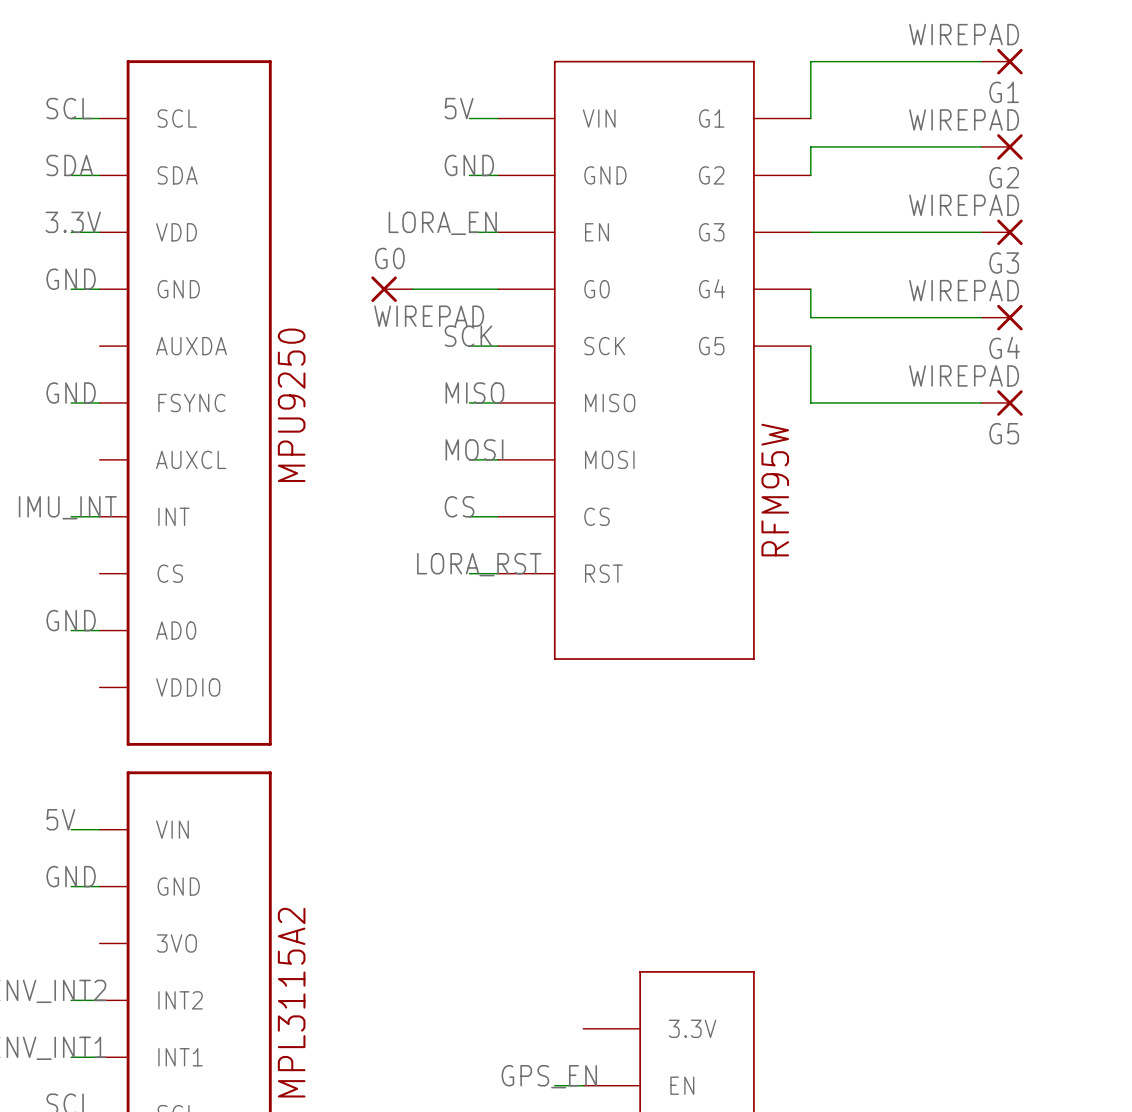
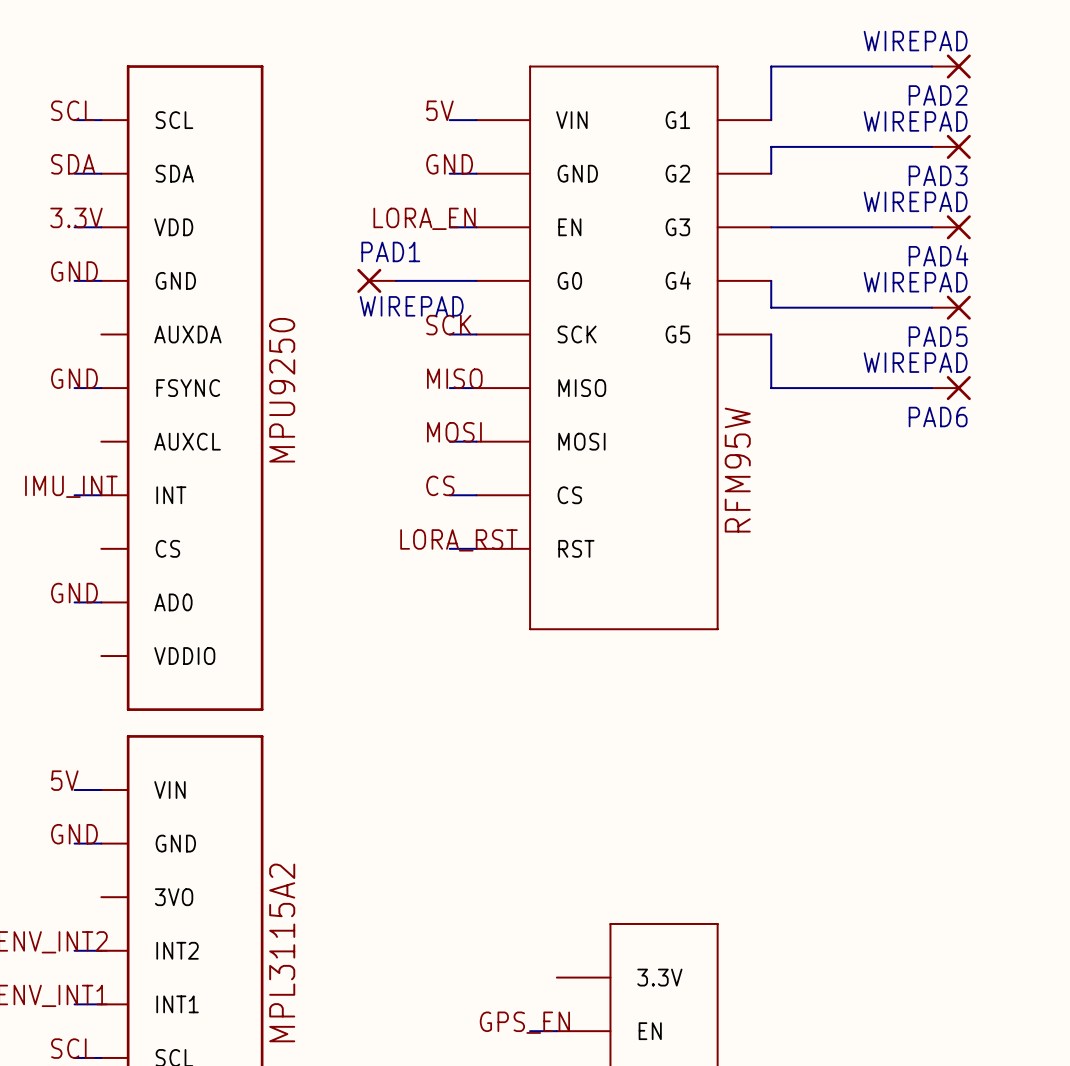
G1 name: G1 (1004, 92) -> PAD2 (938, 95)
G2 name: G2 (1004, 177) -> PAD3 (938, 175)
G0 name: G0 (389, 258) -> PAD1 (390, 251)
G3 name: G3 (1004, 263) -> PAD4 (938, 255)
G4 name: G4 (1004, 347) -> PAD5 (938, 336)
G5 name: G5 (1004, 433) -> PAD6 (938, 417)

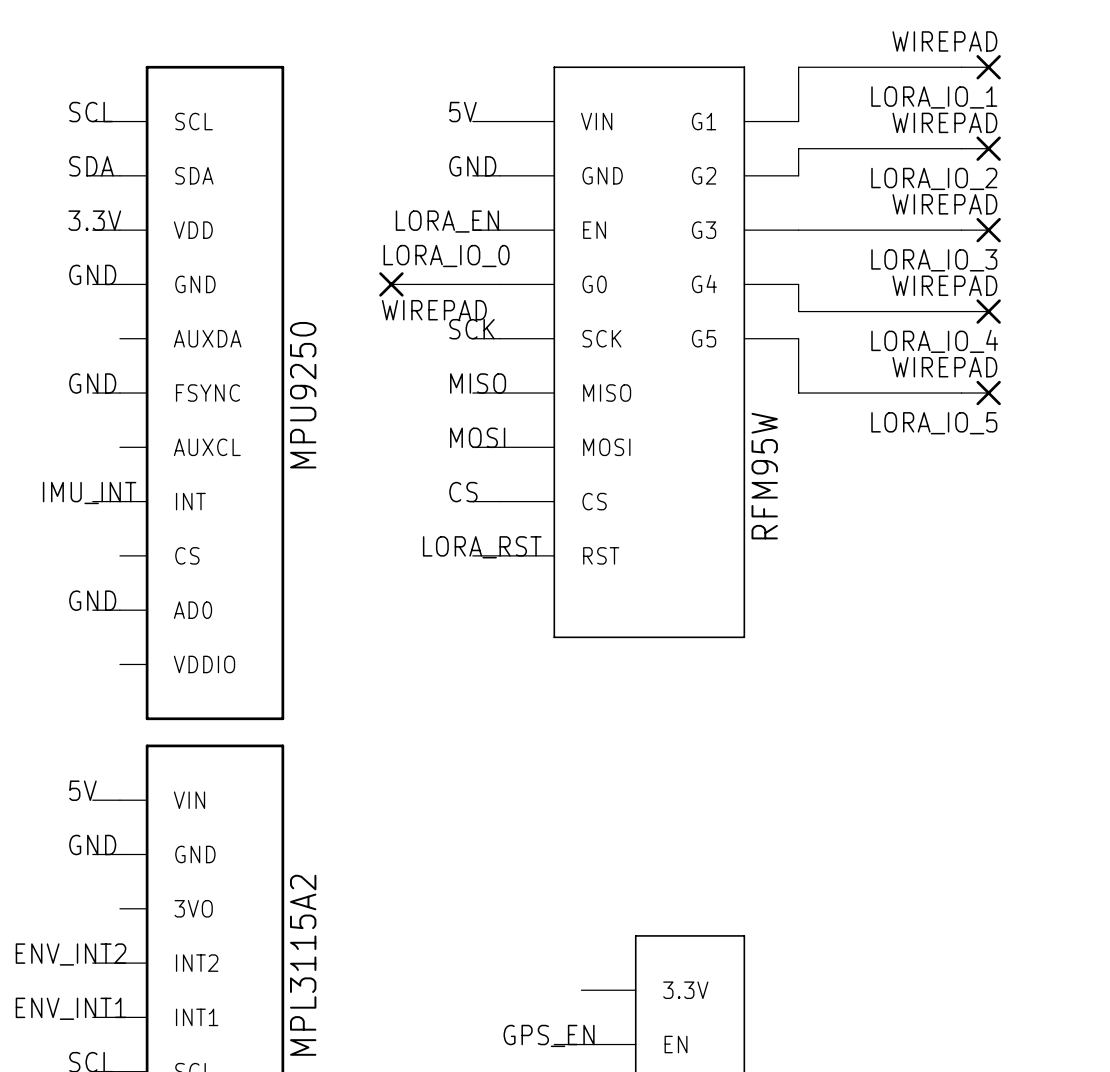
PAD2 name: PAD2 (938, 95) -> LORA_IO_1 (934, 97)
PAD3 name: PAD3 (938, 175) -> LORA_IO_2 (934, 178)
PAD1 name: PAD1 (390, 251) -> LORA_IO_0 (446, 256)
PAD4 name: PAD4 (938, 255) -> LORA_IO_3 (934, 260)
PAD5 name: PAD5 (938, 336) -> LORA_IO_4 (934, 341)
PAD6 name: PAD6 (938, 417) -> LORA_IO_5 (934, 423)

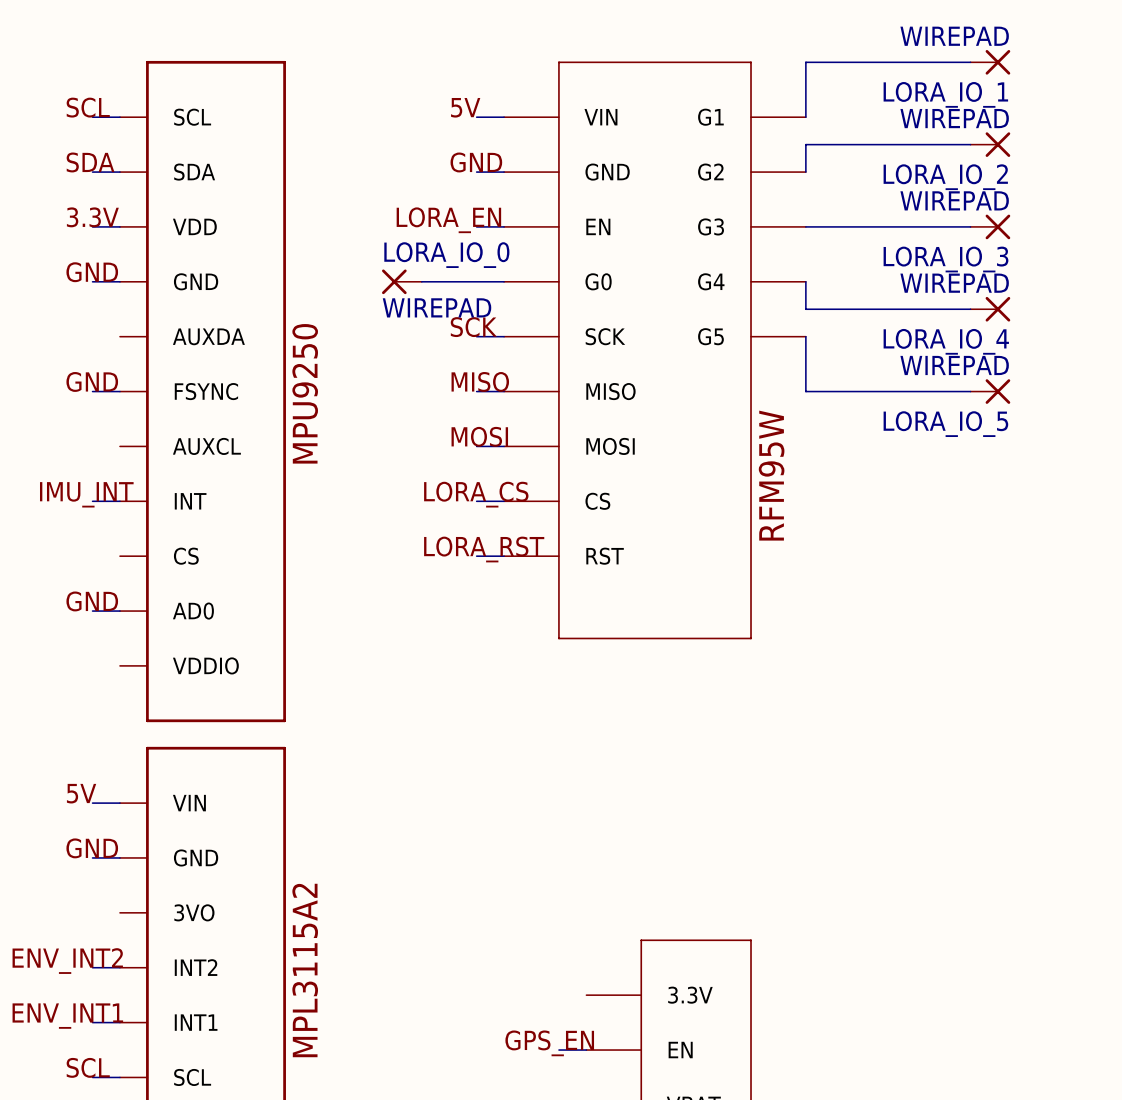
label: CS (463, 492) -> none
label: none -> LORA_CS (476, 494)

